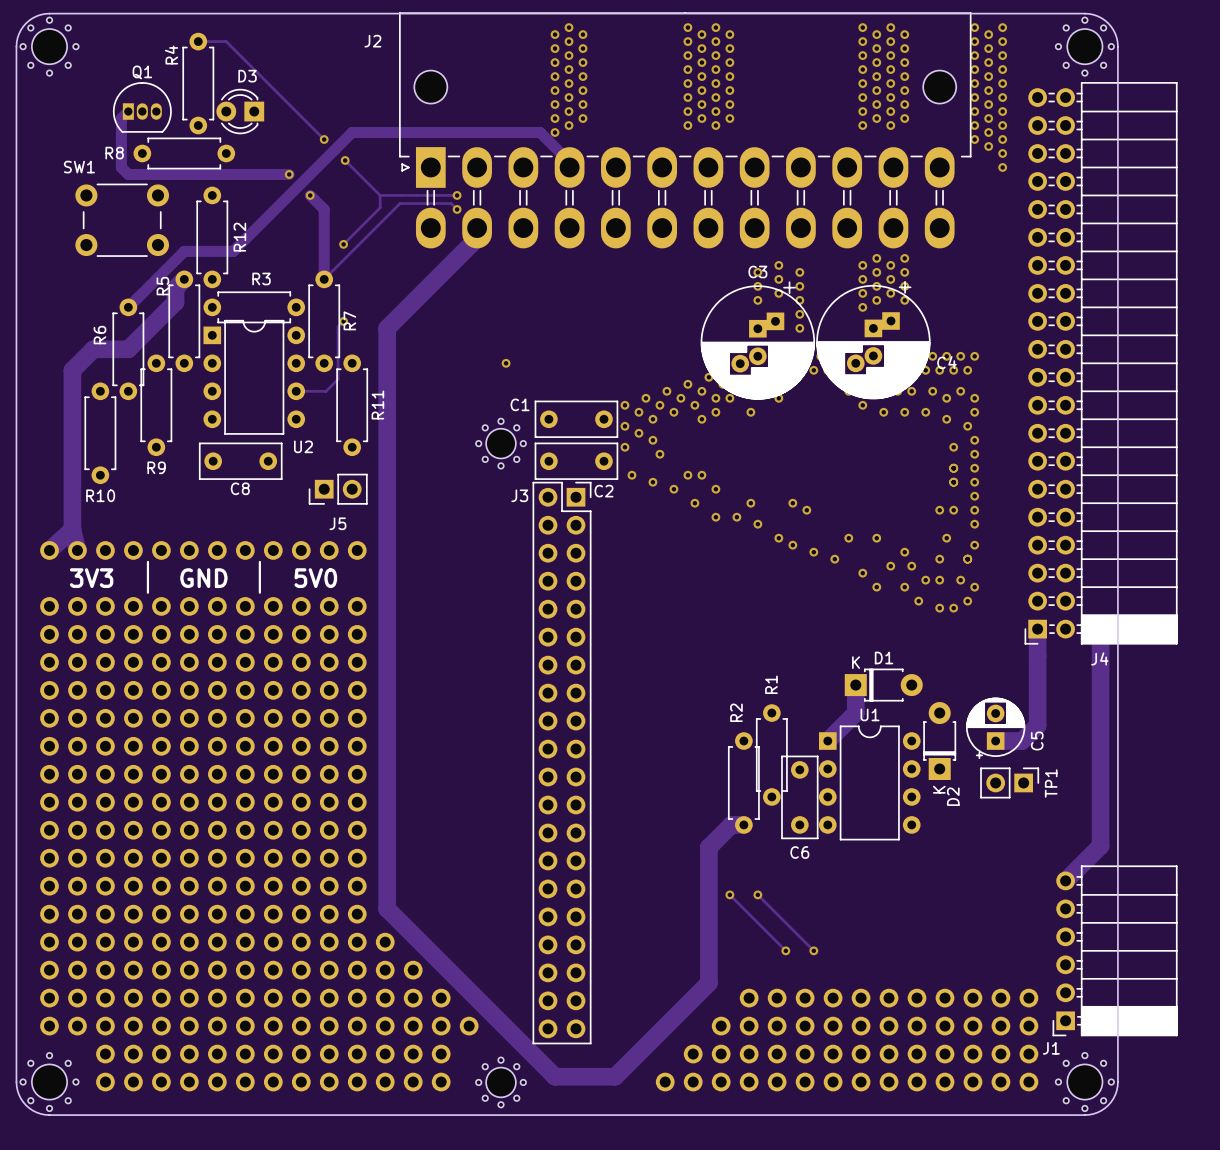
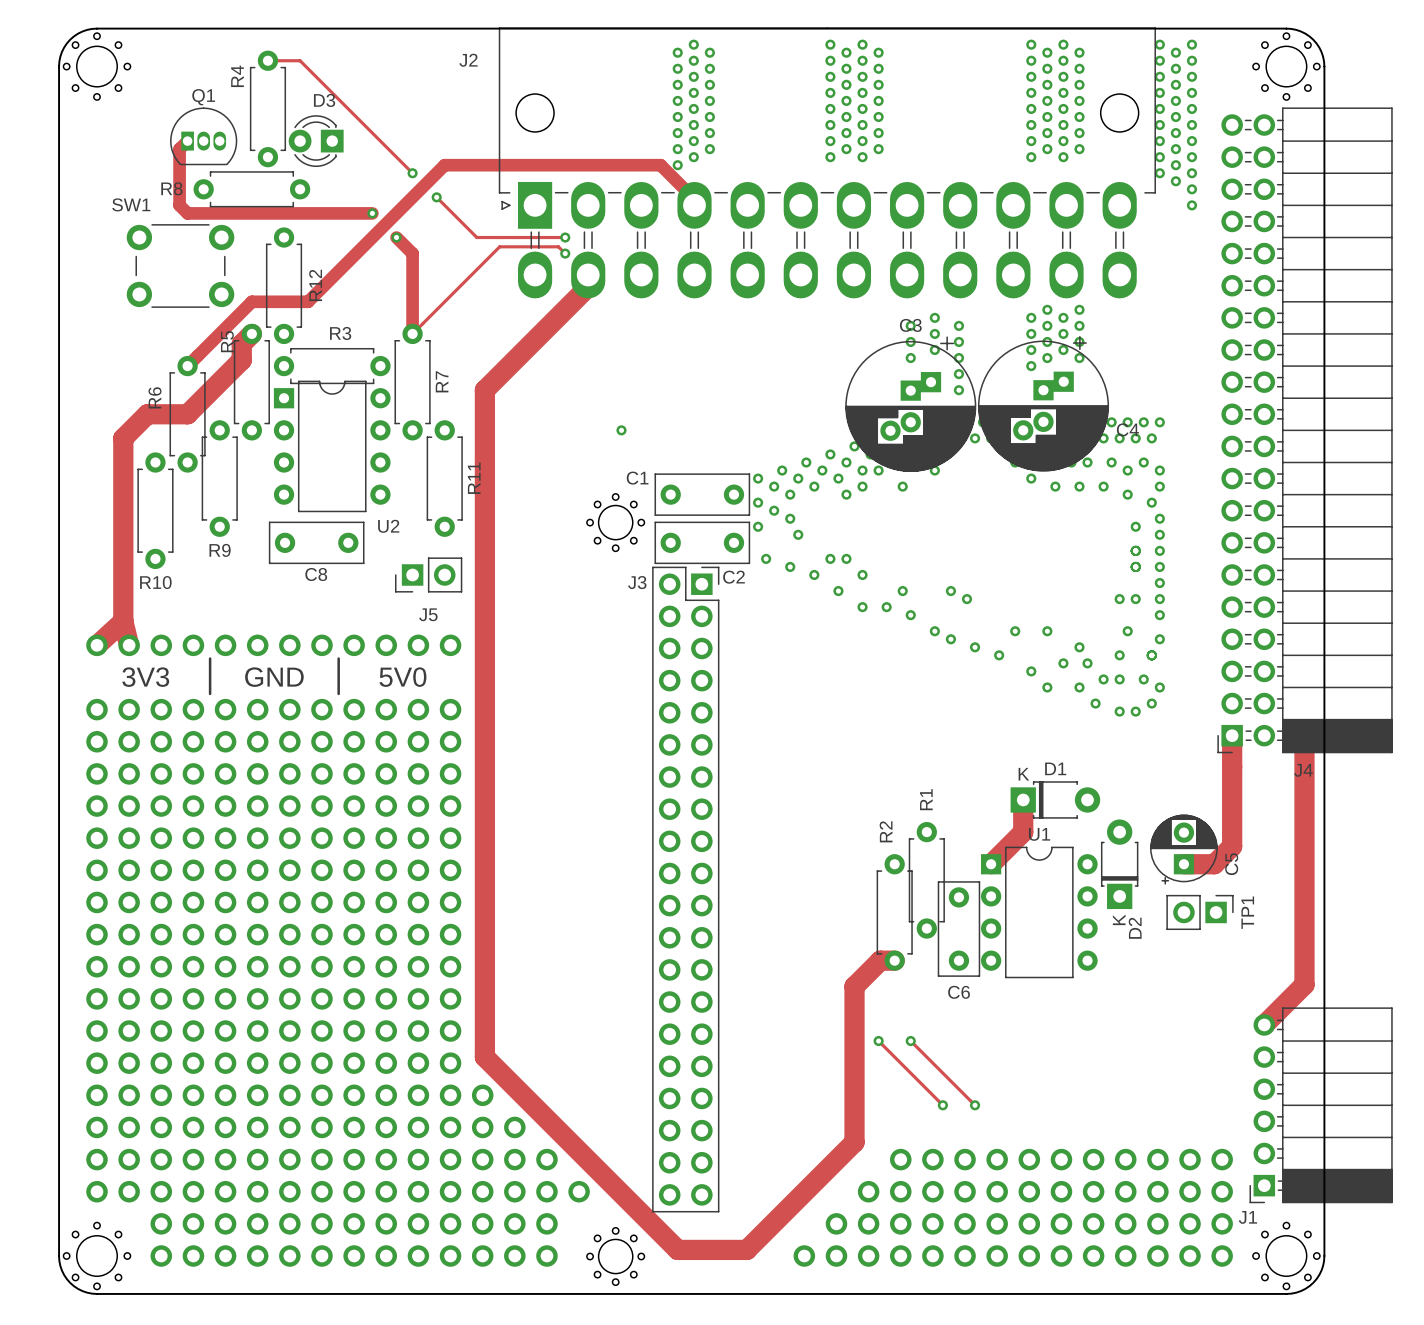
track: (380, 195) (380, 207) (343, 244) -> none
via: (343, 244) -> none
track: (343, 321) (338, 326) (338, 379) (326, 391) (296, 391) -> none
via: (343, 321) -> none

